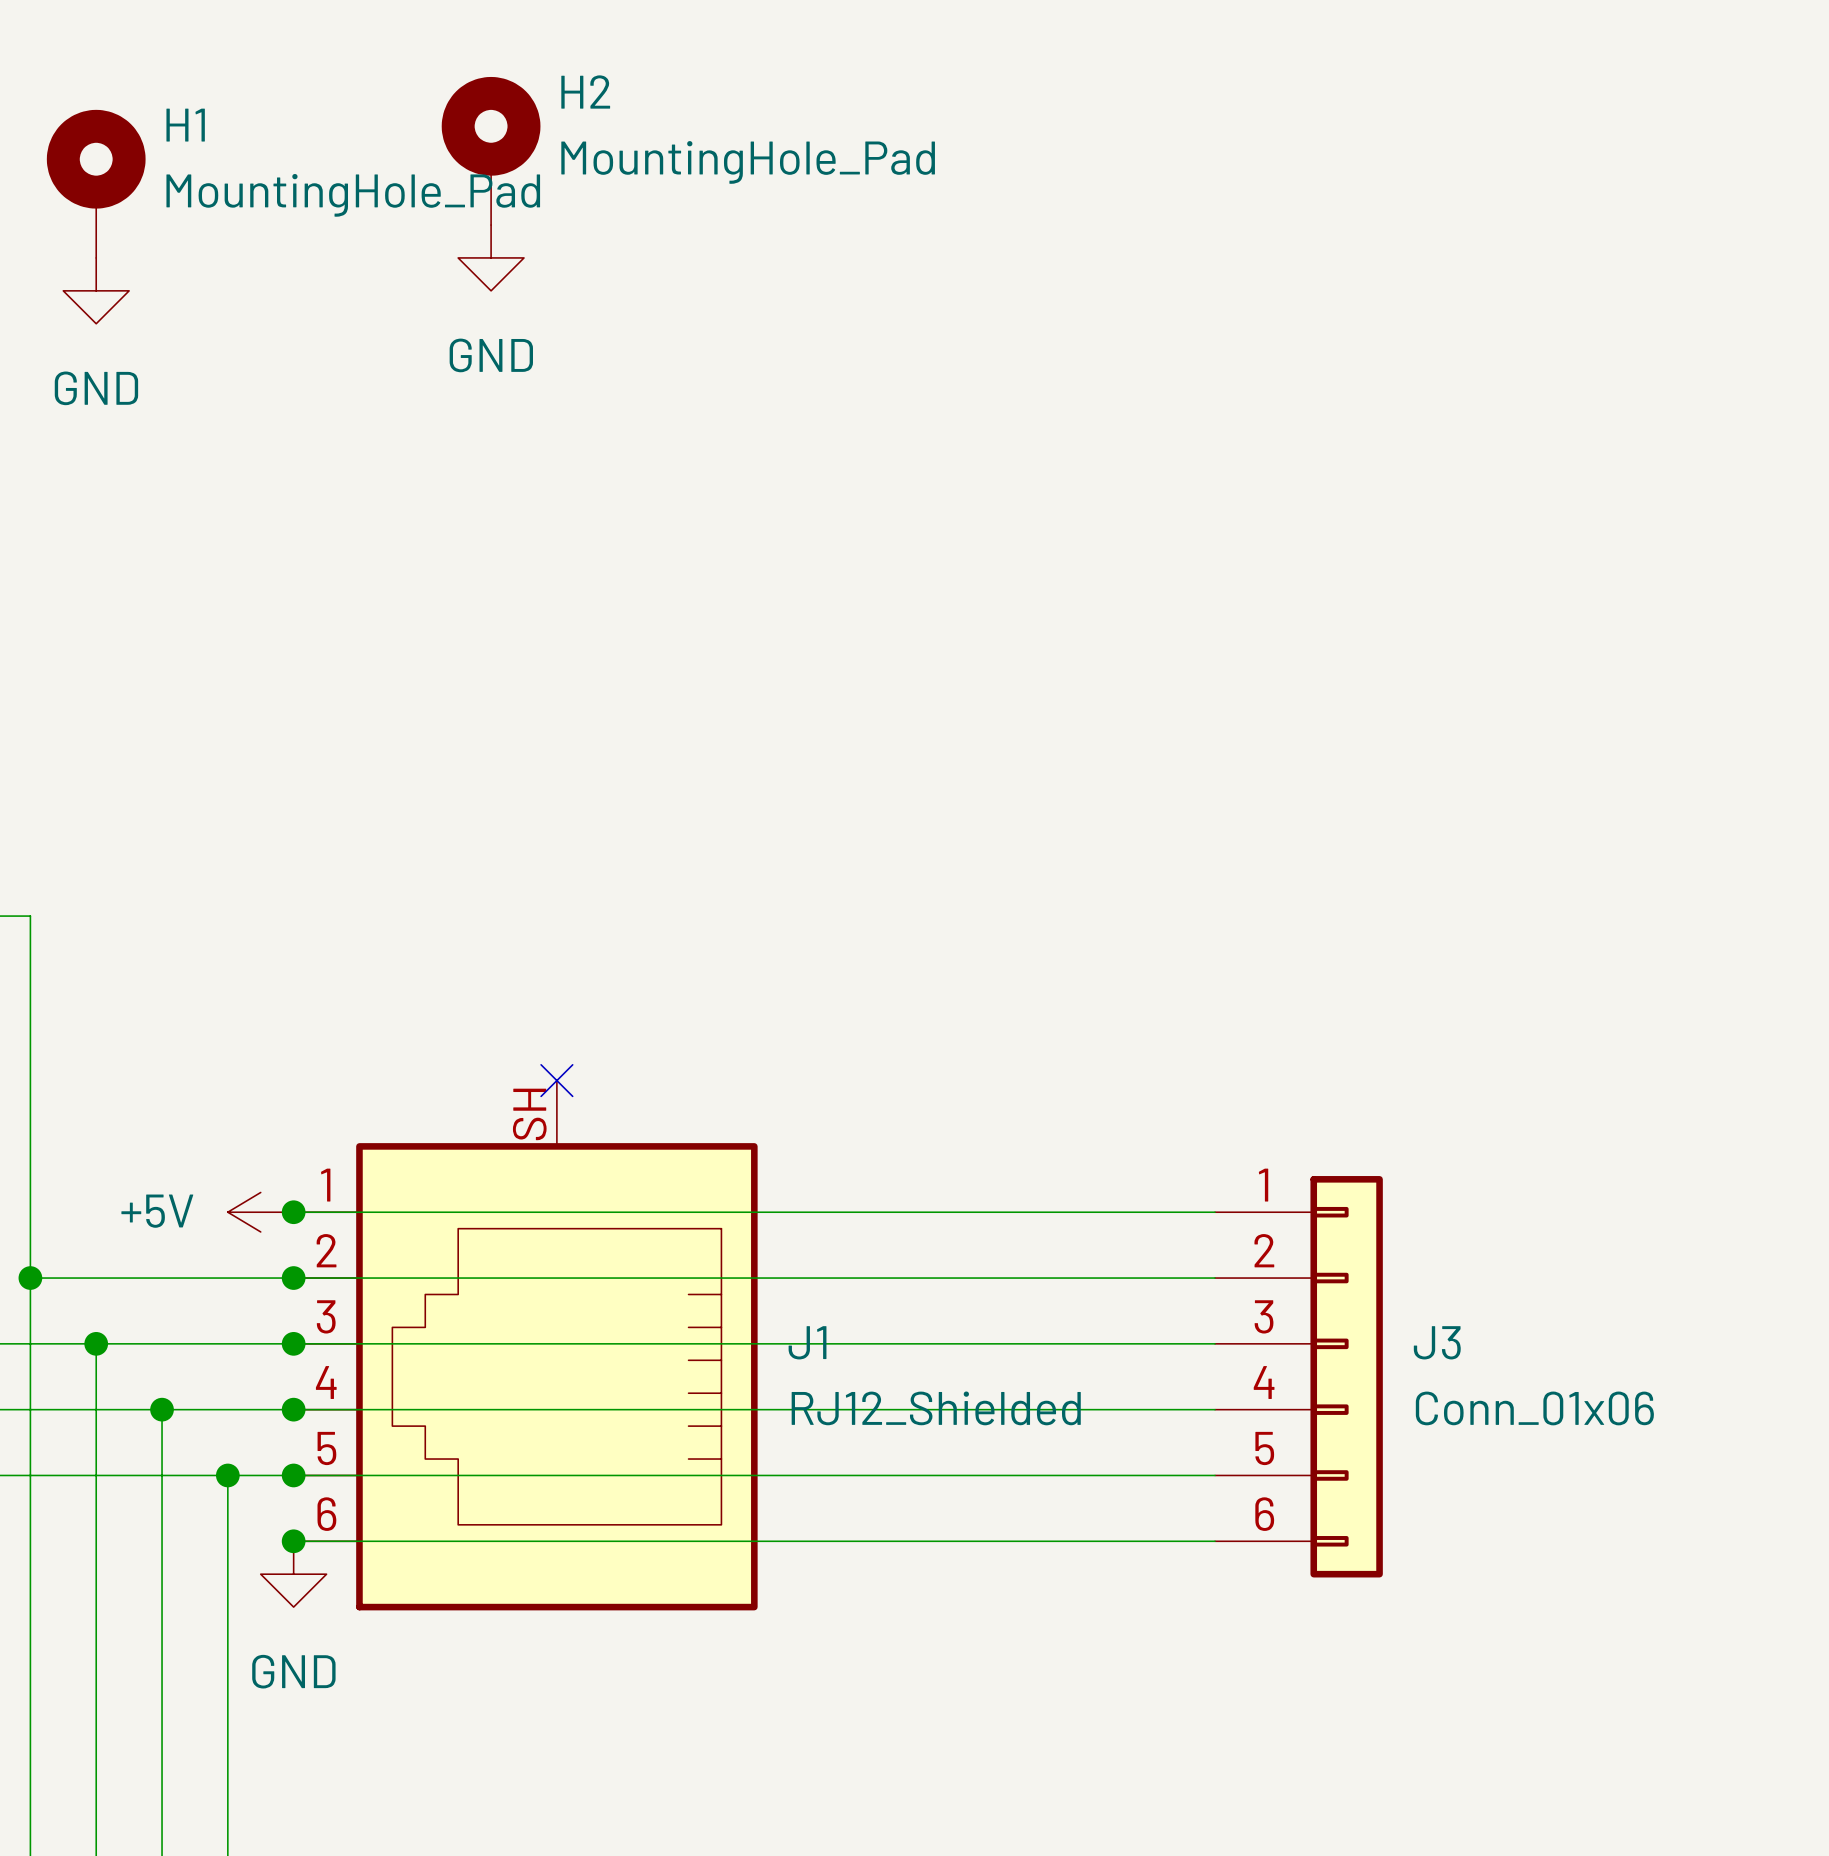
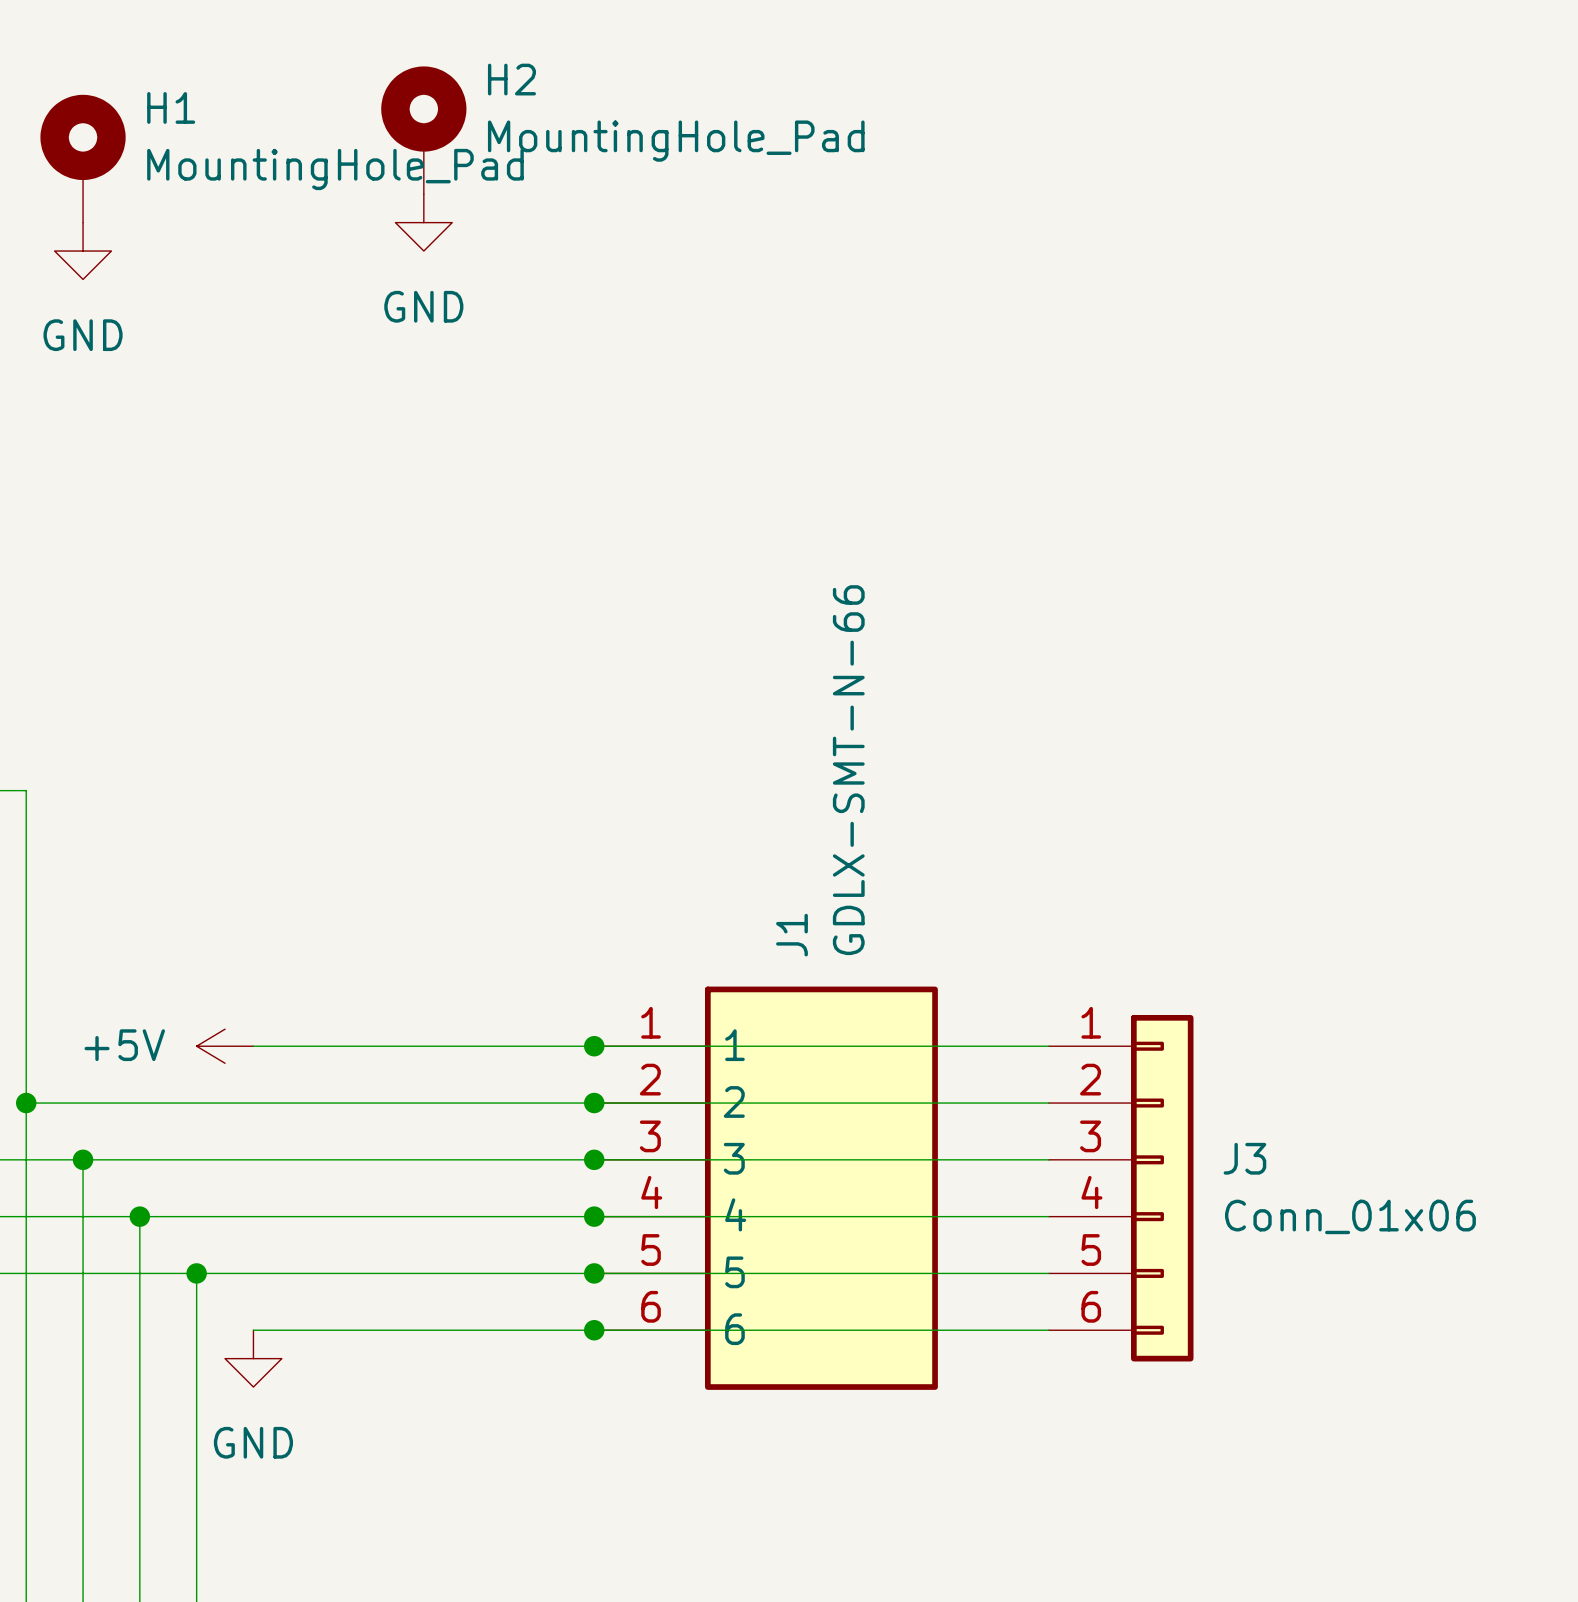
J1 symbol: [293, 1080, 758, 1611] -> [594, 986, 938, 1390]
no-connect mark: (556, 1080) -> none
junction: (293, 1212) -> none
junction: none -> (594, 1046)
junction: (293, 1278) -> none
junction: none -> (594, 1103)
J1 name position: J1 (807, 1342) -> J1 (791, 935)
junction: (293, 1343) -> none
junction: none -> (594, 1159)
J1 value: RJ12_Shielded (936, 1408) -> GDLX-SMT-N-66 (848, 770)
junction: (293, 1409) -> none
junction: none -> (594, 1216)
junction: (293, 1475) -> none
junction: none -> (594, 1273)
junction: (293, 1541) -> none
junction: none -> (594, 1330)

